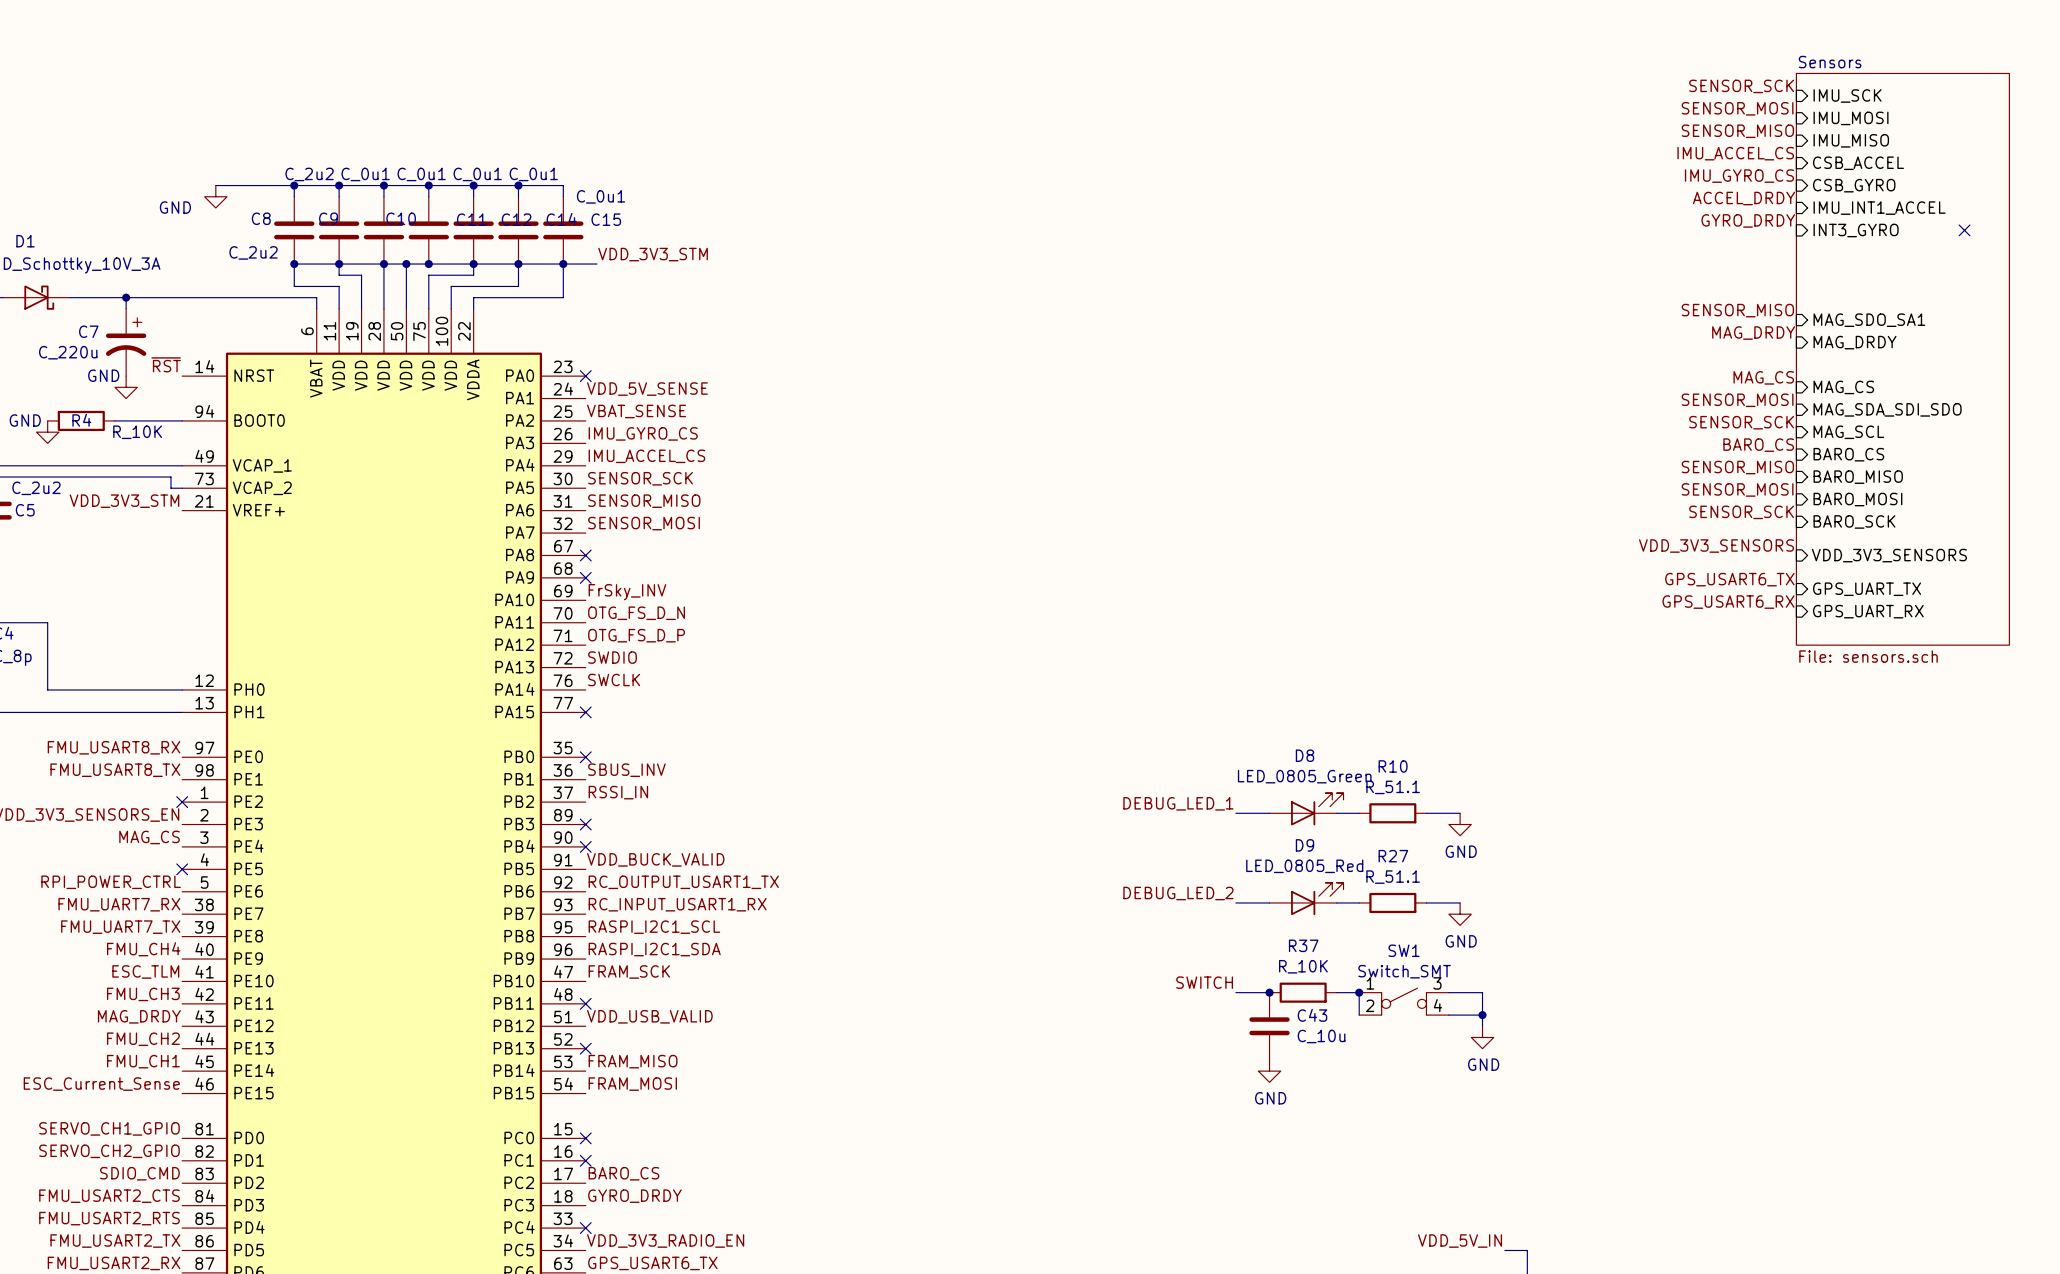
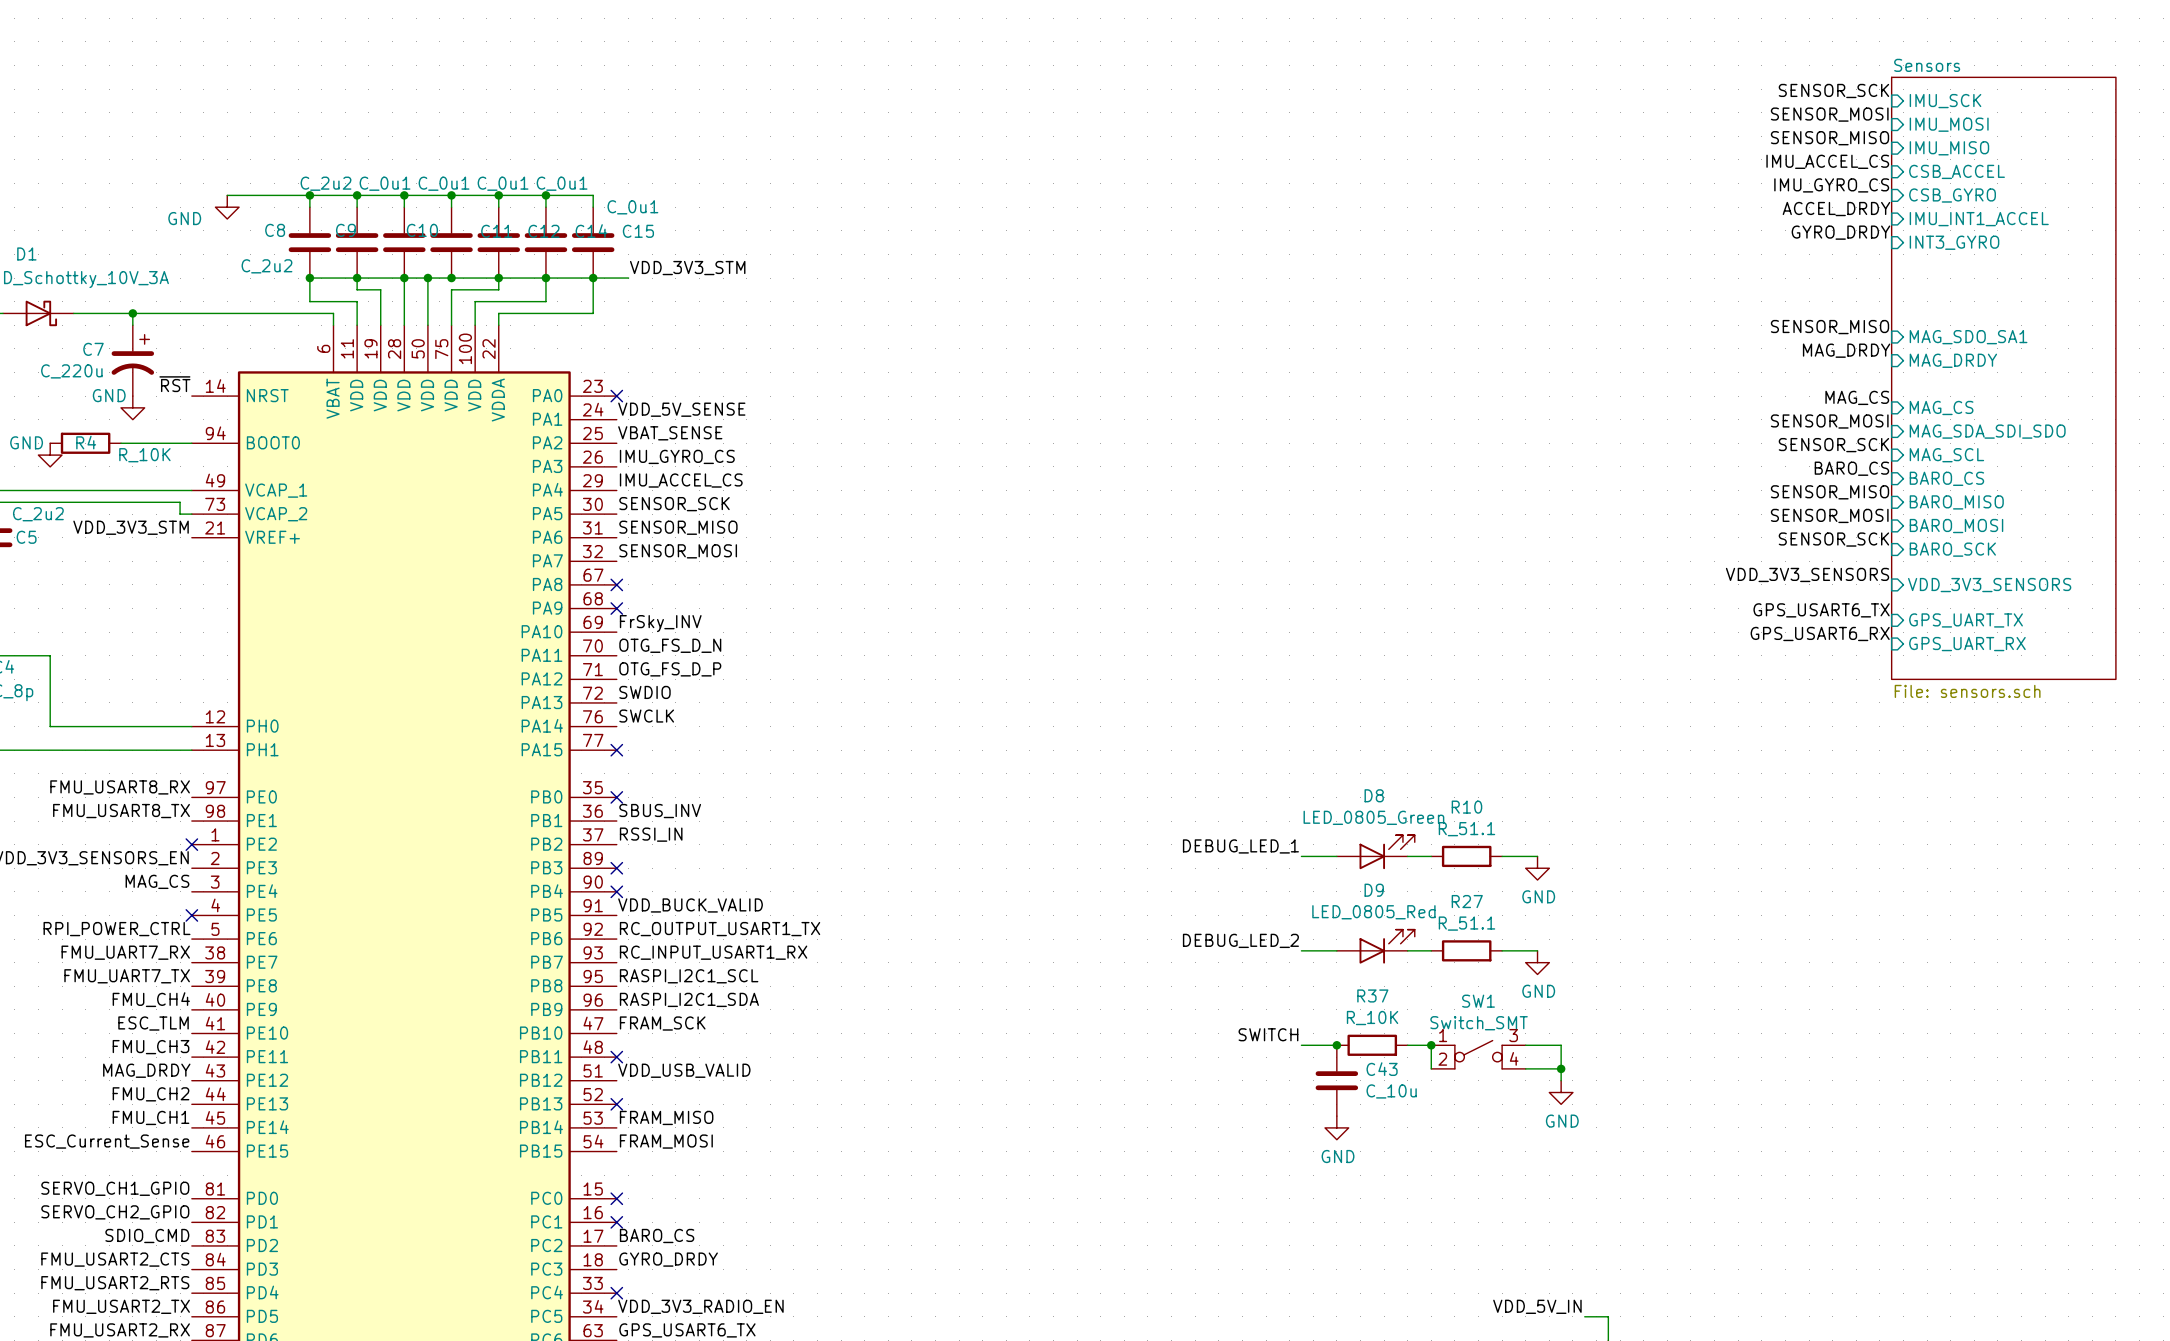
no-connect mark: (1964, 230) -> none

